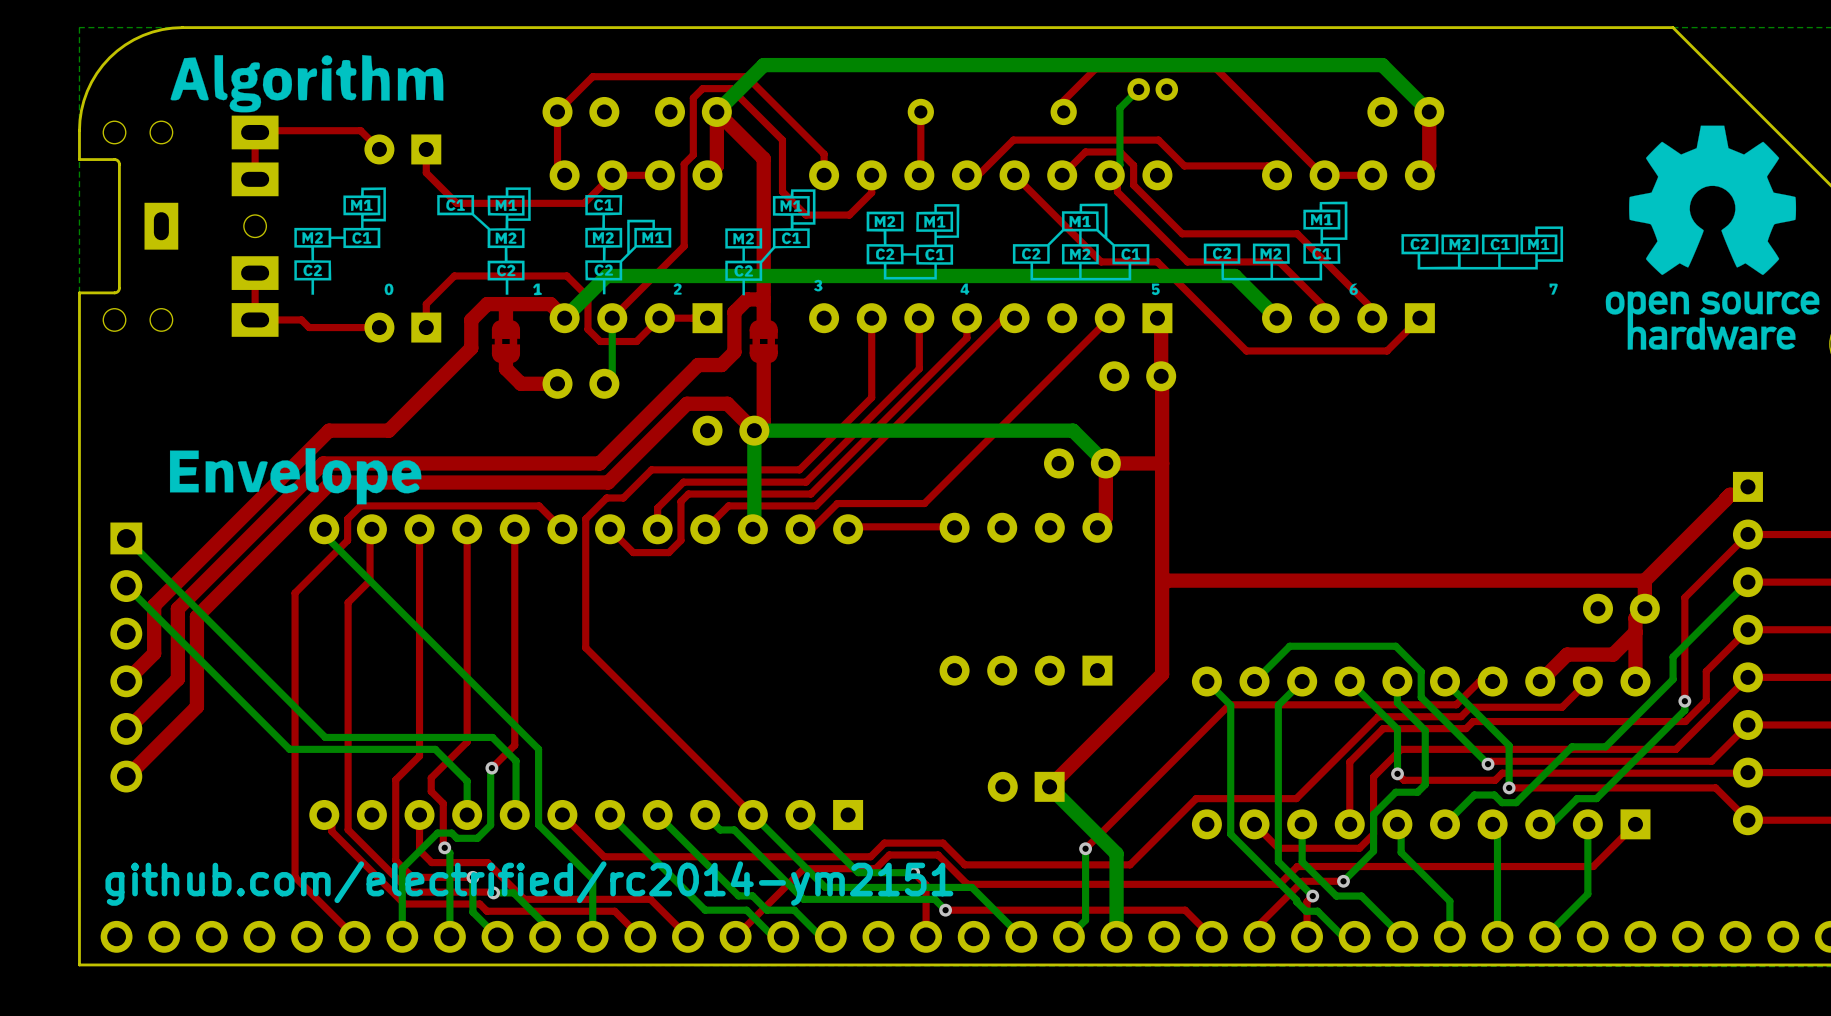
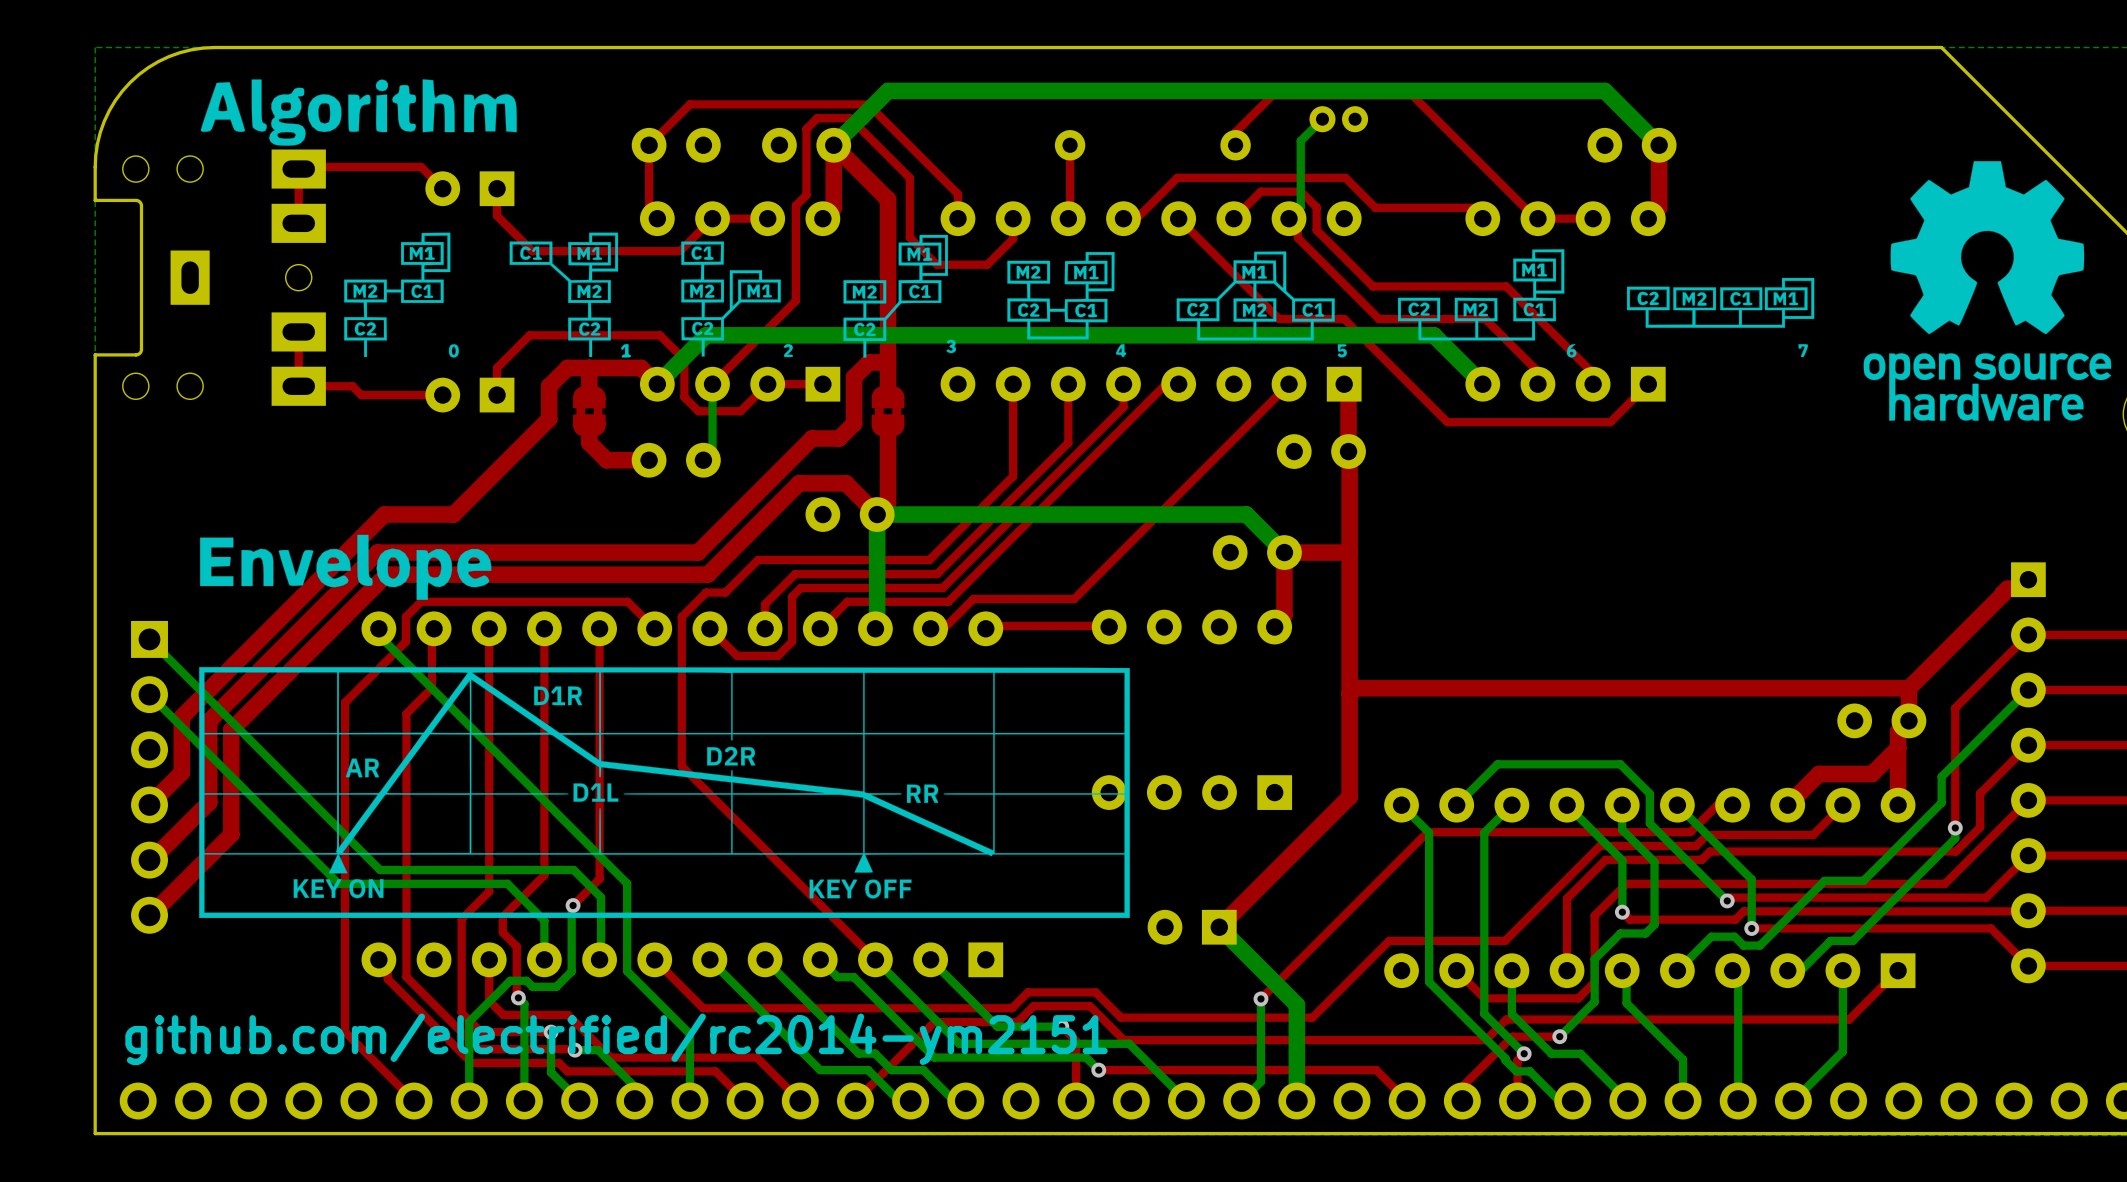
drawing: none -> [199, 667, 1130, 919]

